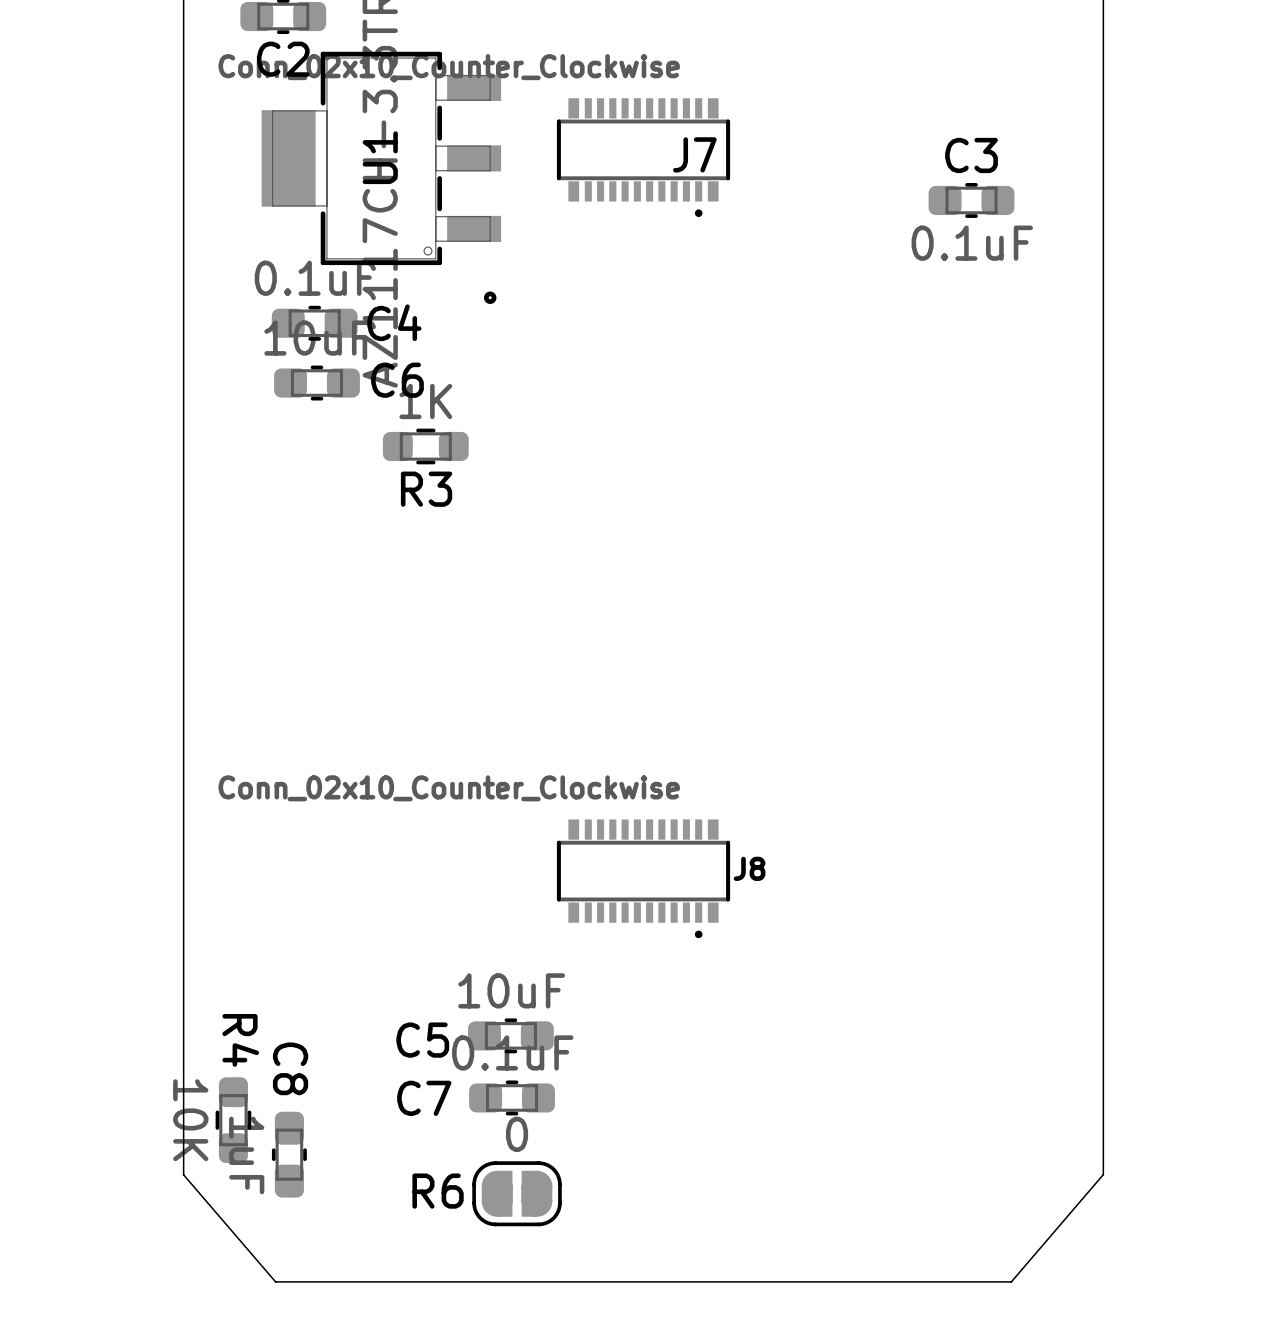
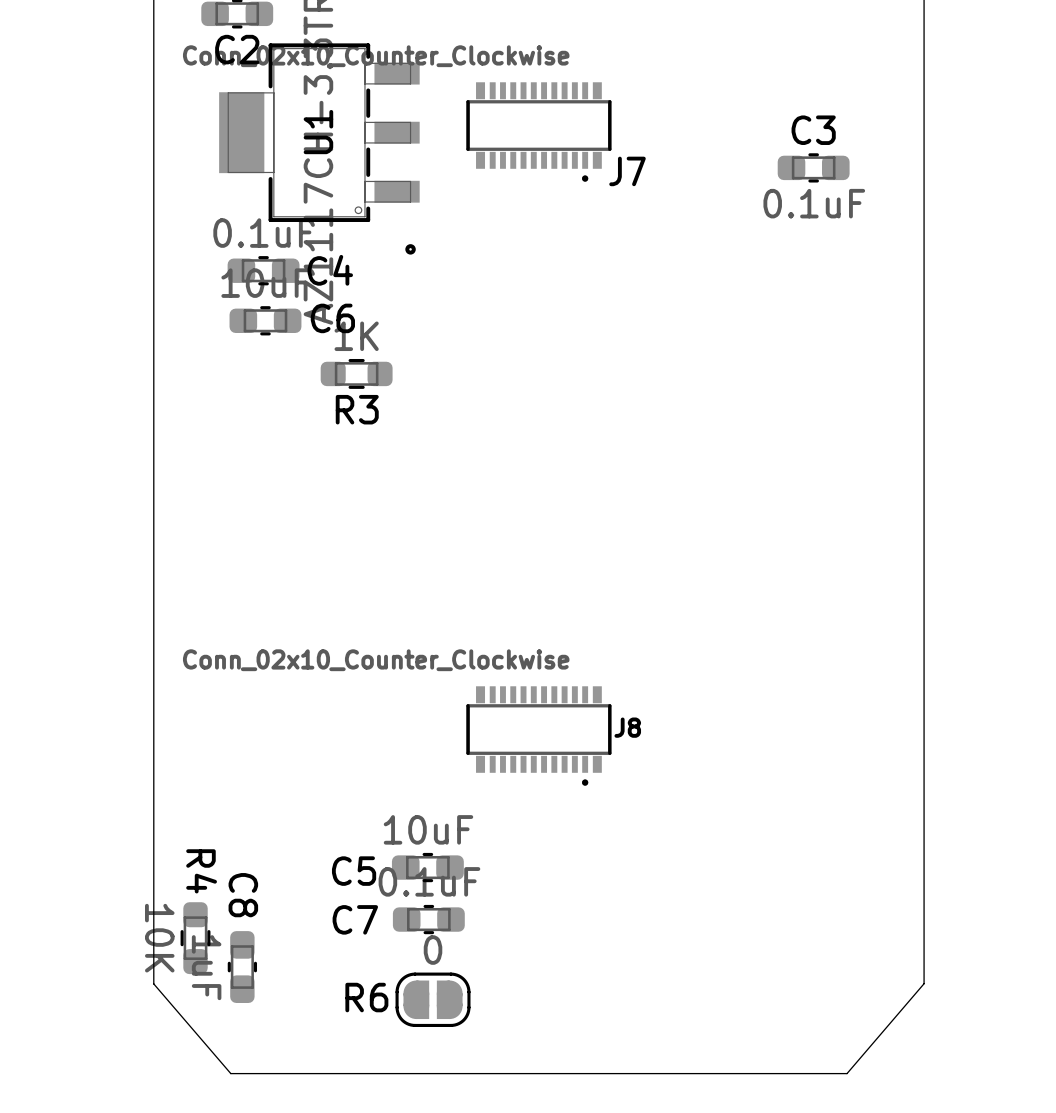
J7 name position: J7 (694, 154) -> J7 (627, 171)

